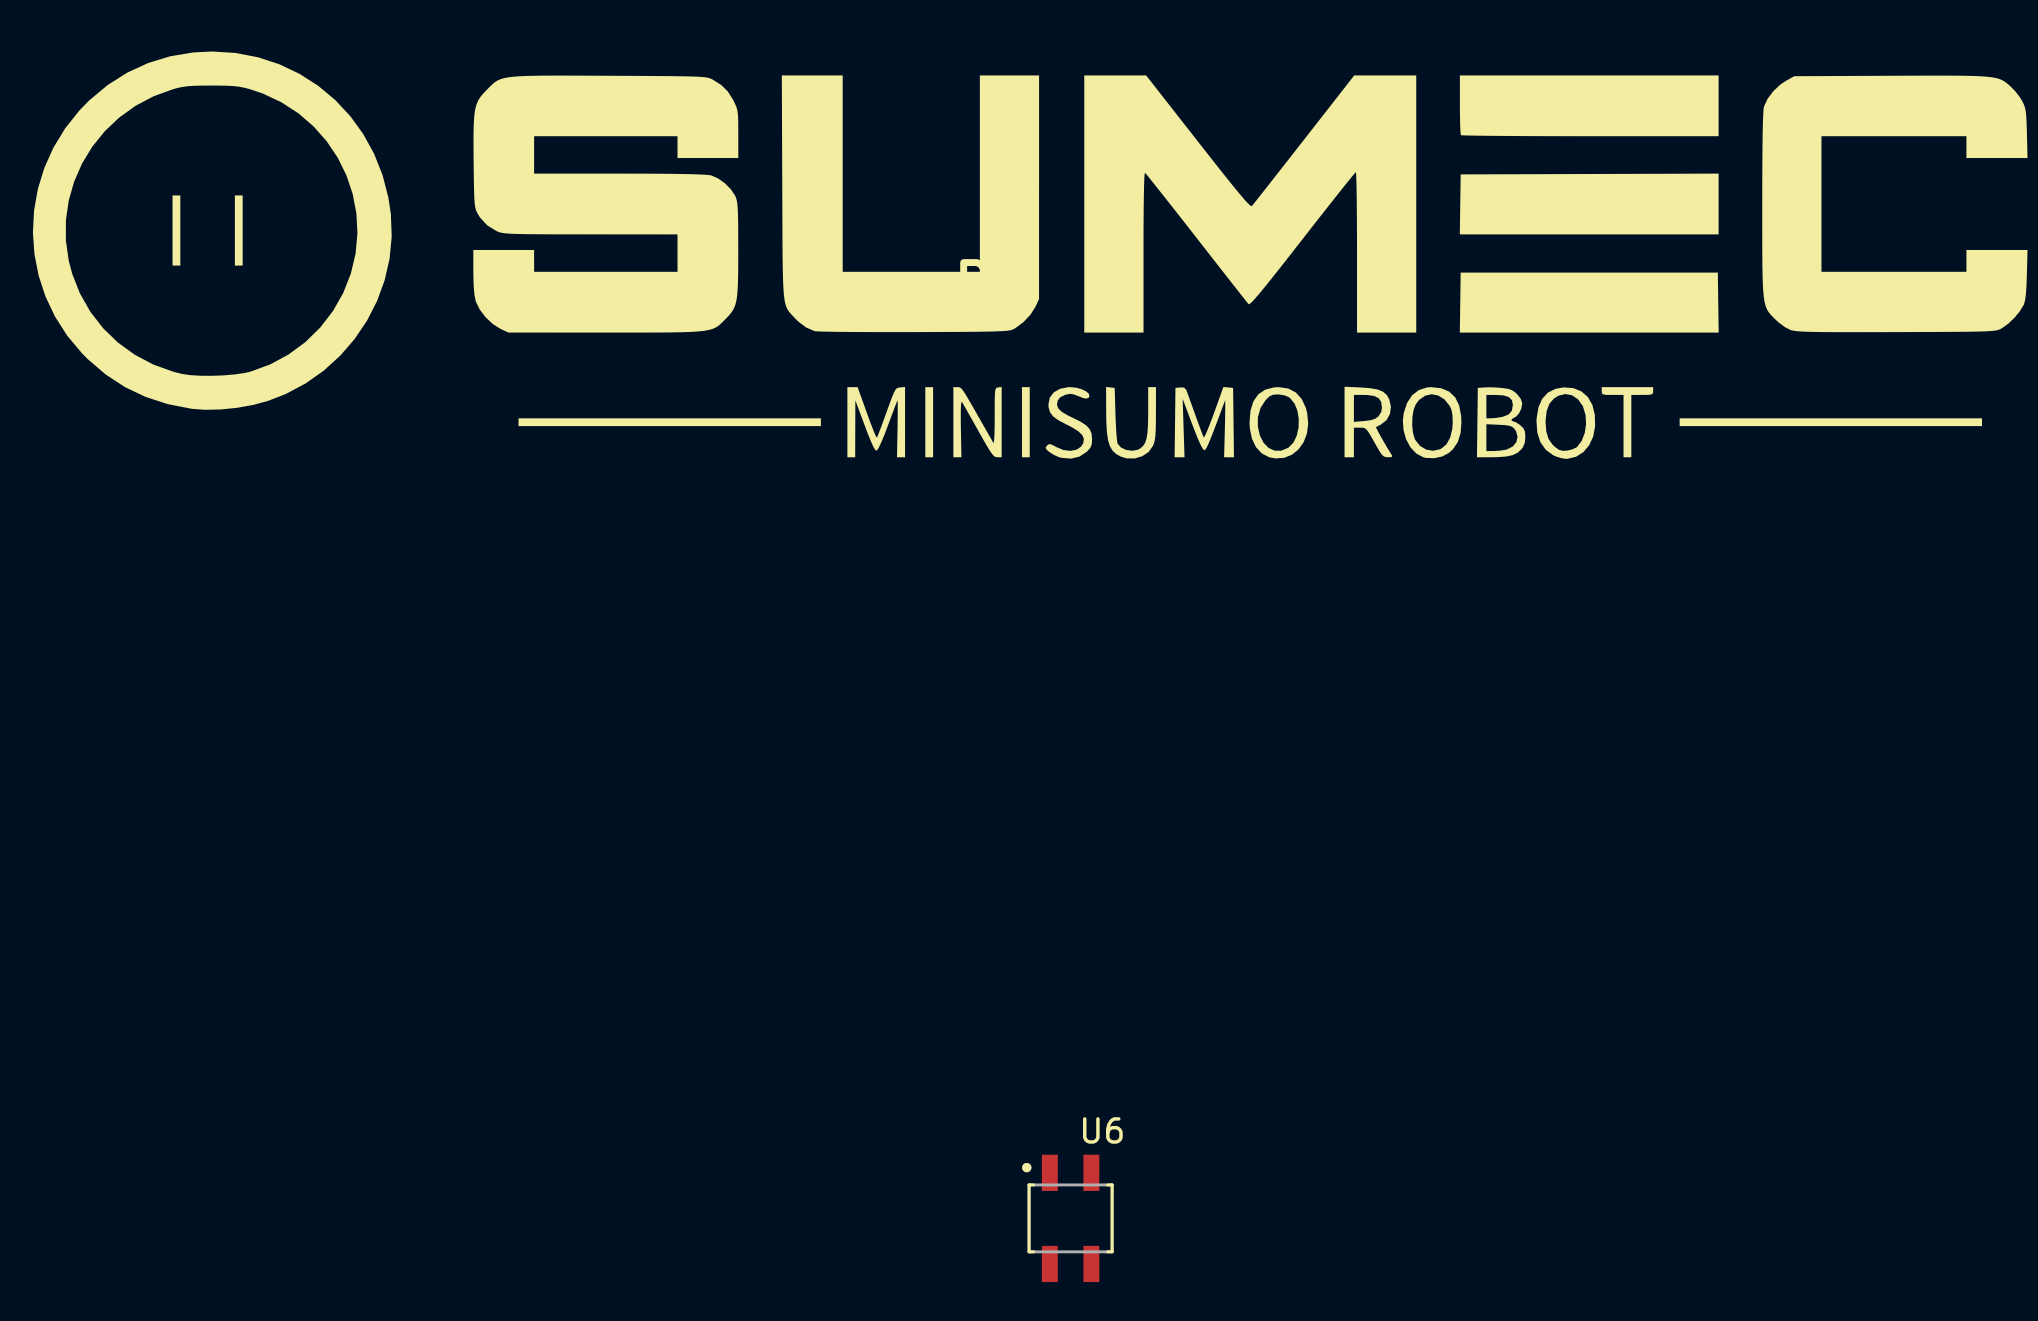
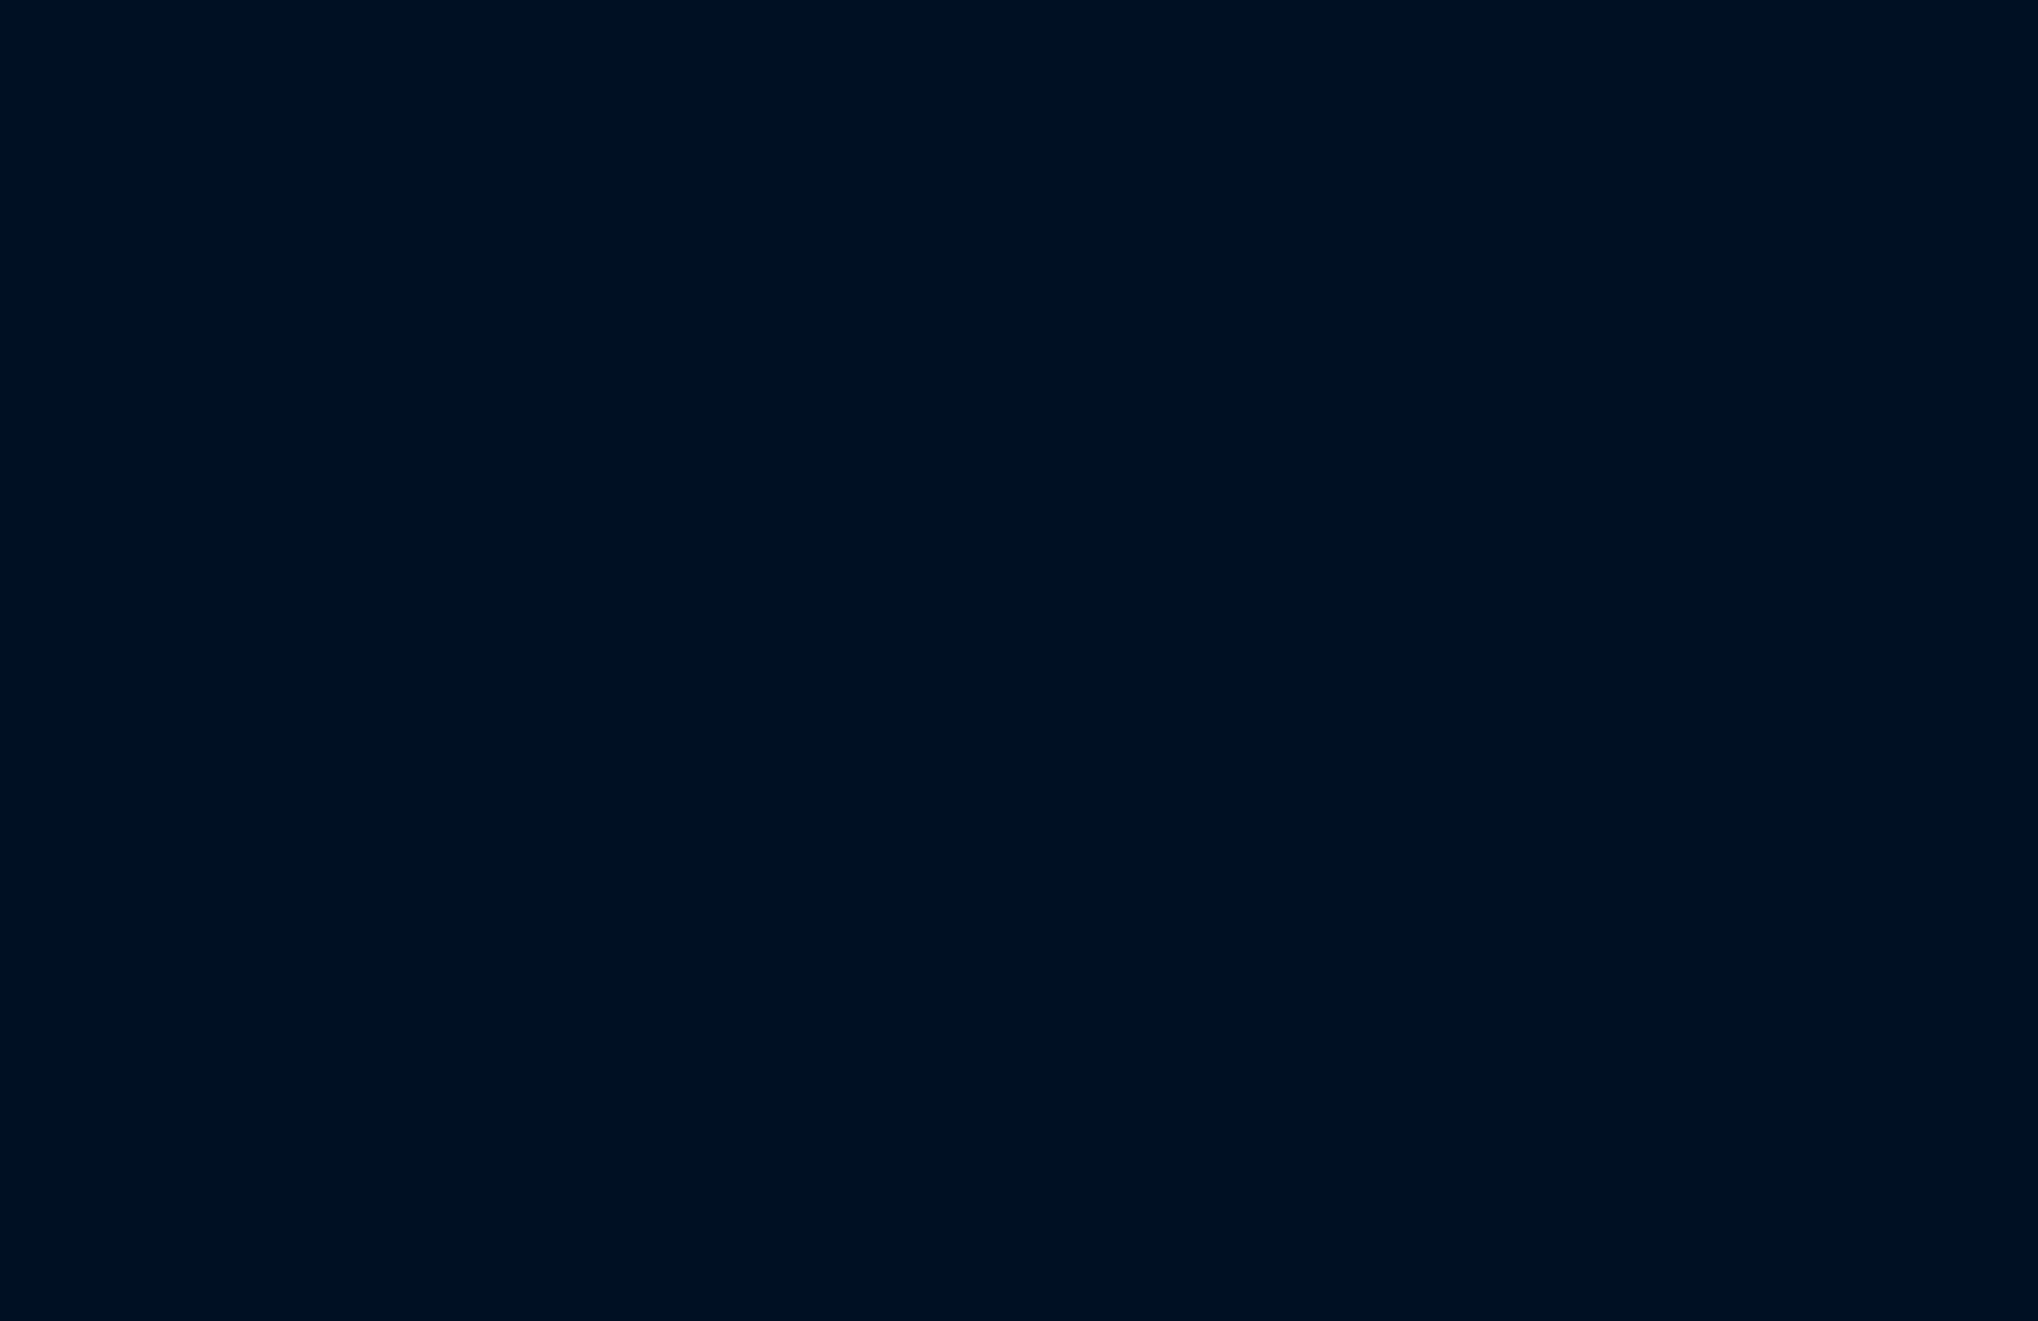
part: (1030, 255) -> none
U6: (1067, 1218) -> none

